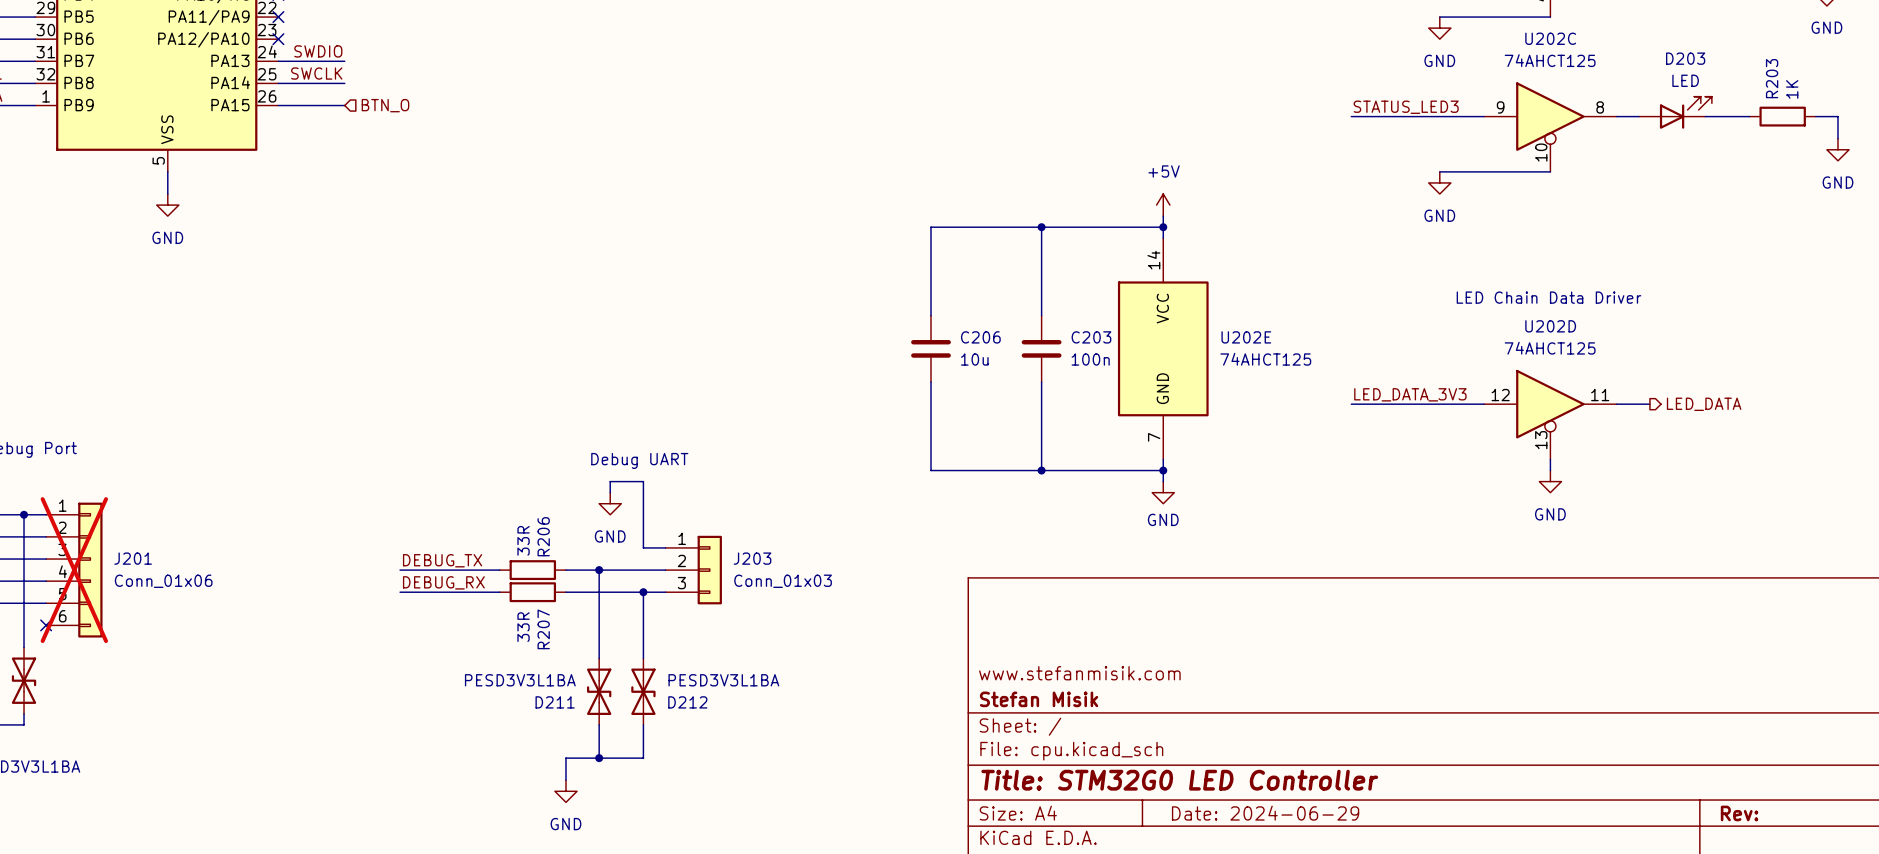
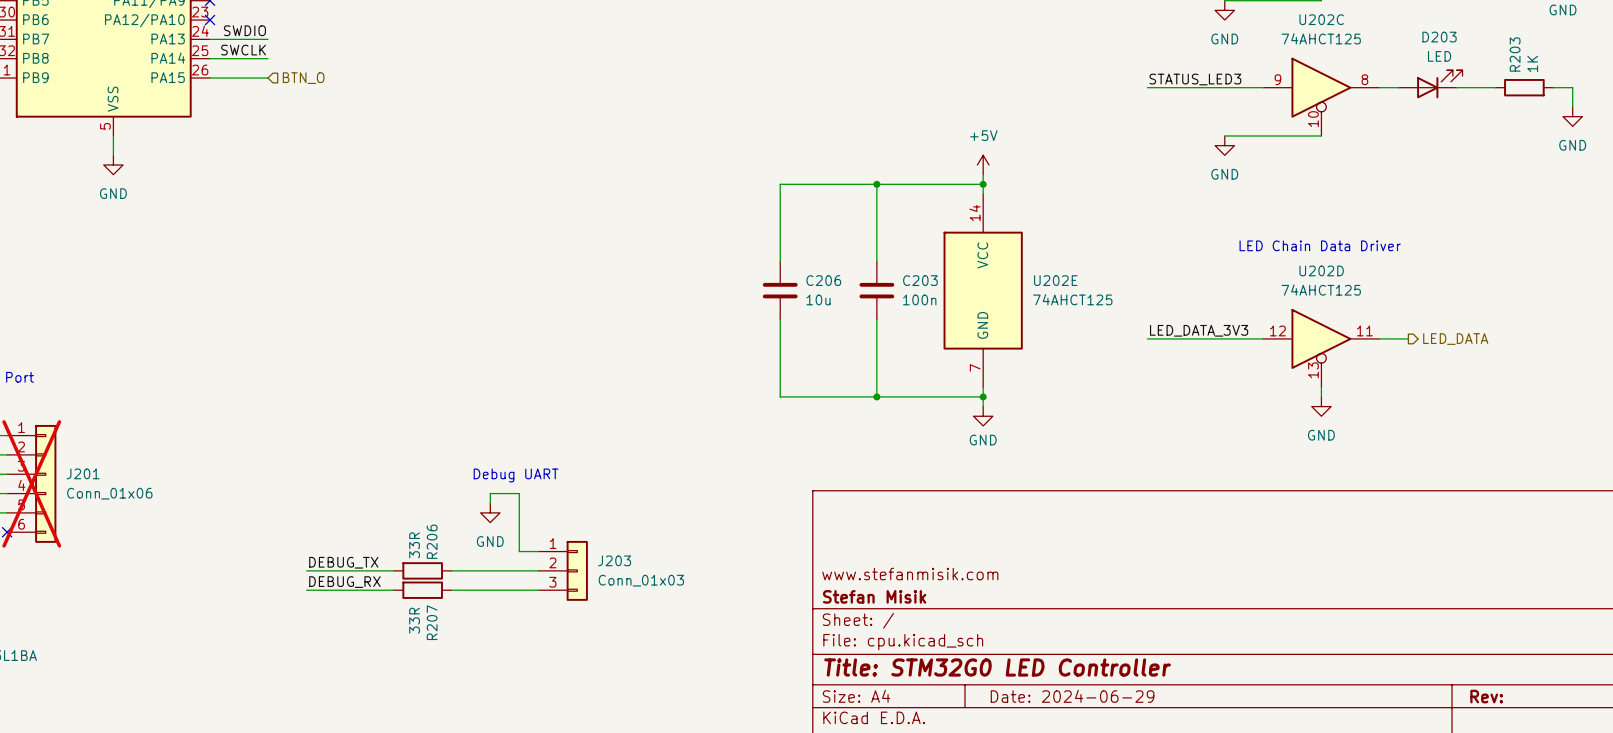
text position: Debug UART (639, 460) -> Debug UART (516, 475)
wire: (610, 492) (610, 481) (643, 481) (643, 547) (665, 547) -> none
power symbol: GND (610, 503) -> none
label position: DEBUG_TX (442, 560) -> DEBUG_TX (343, 562)
wire: (400, 570) (499, 570) -> (306, 570) (393, 570)
R206 position: (532, 570) -> (422, 570)
wire: (565, 570) (665, 570) -> (451, 570) (538, 570)
wire: (599, 570) (599, 581) -> (538, 551) (519, 551) (519, 493) (490, 493)
junction: (599, 570) -> none
J203 position: (693, 570) -> (563, 570)
label position: DEBUG_RX (443, 582) -> DEBUG_RX (344, 582)
wire: (400, 592) (499, 592) -> (306, 590) (393, 590)
R207 position: (532, 592) -> (422, 590)
wire: (565, 592) (665, 592) -> (451, 590) (538, 590)
wire: (599, 592) (599, 658) -> none
wire: (643, 592) (643, 658) -> none
junction: (643, 592) -> none
power symbol: none -> GND (490, 512)
D211: PESD3V3L1BA (599, 691) -> none
D212: PESD3V3L1BA (643, 691) -> none
wire: (599, 724) (599, 758) -> none
wire: (643, 724) (643, 758) (565, 758) (565, 780) -> none
junction: (599, 758) -> none
power symbol: GND (565, 791) -> none

